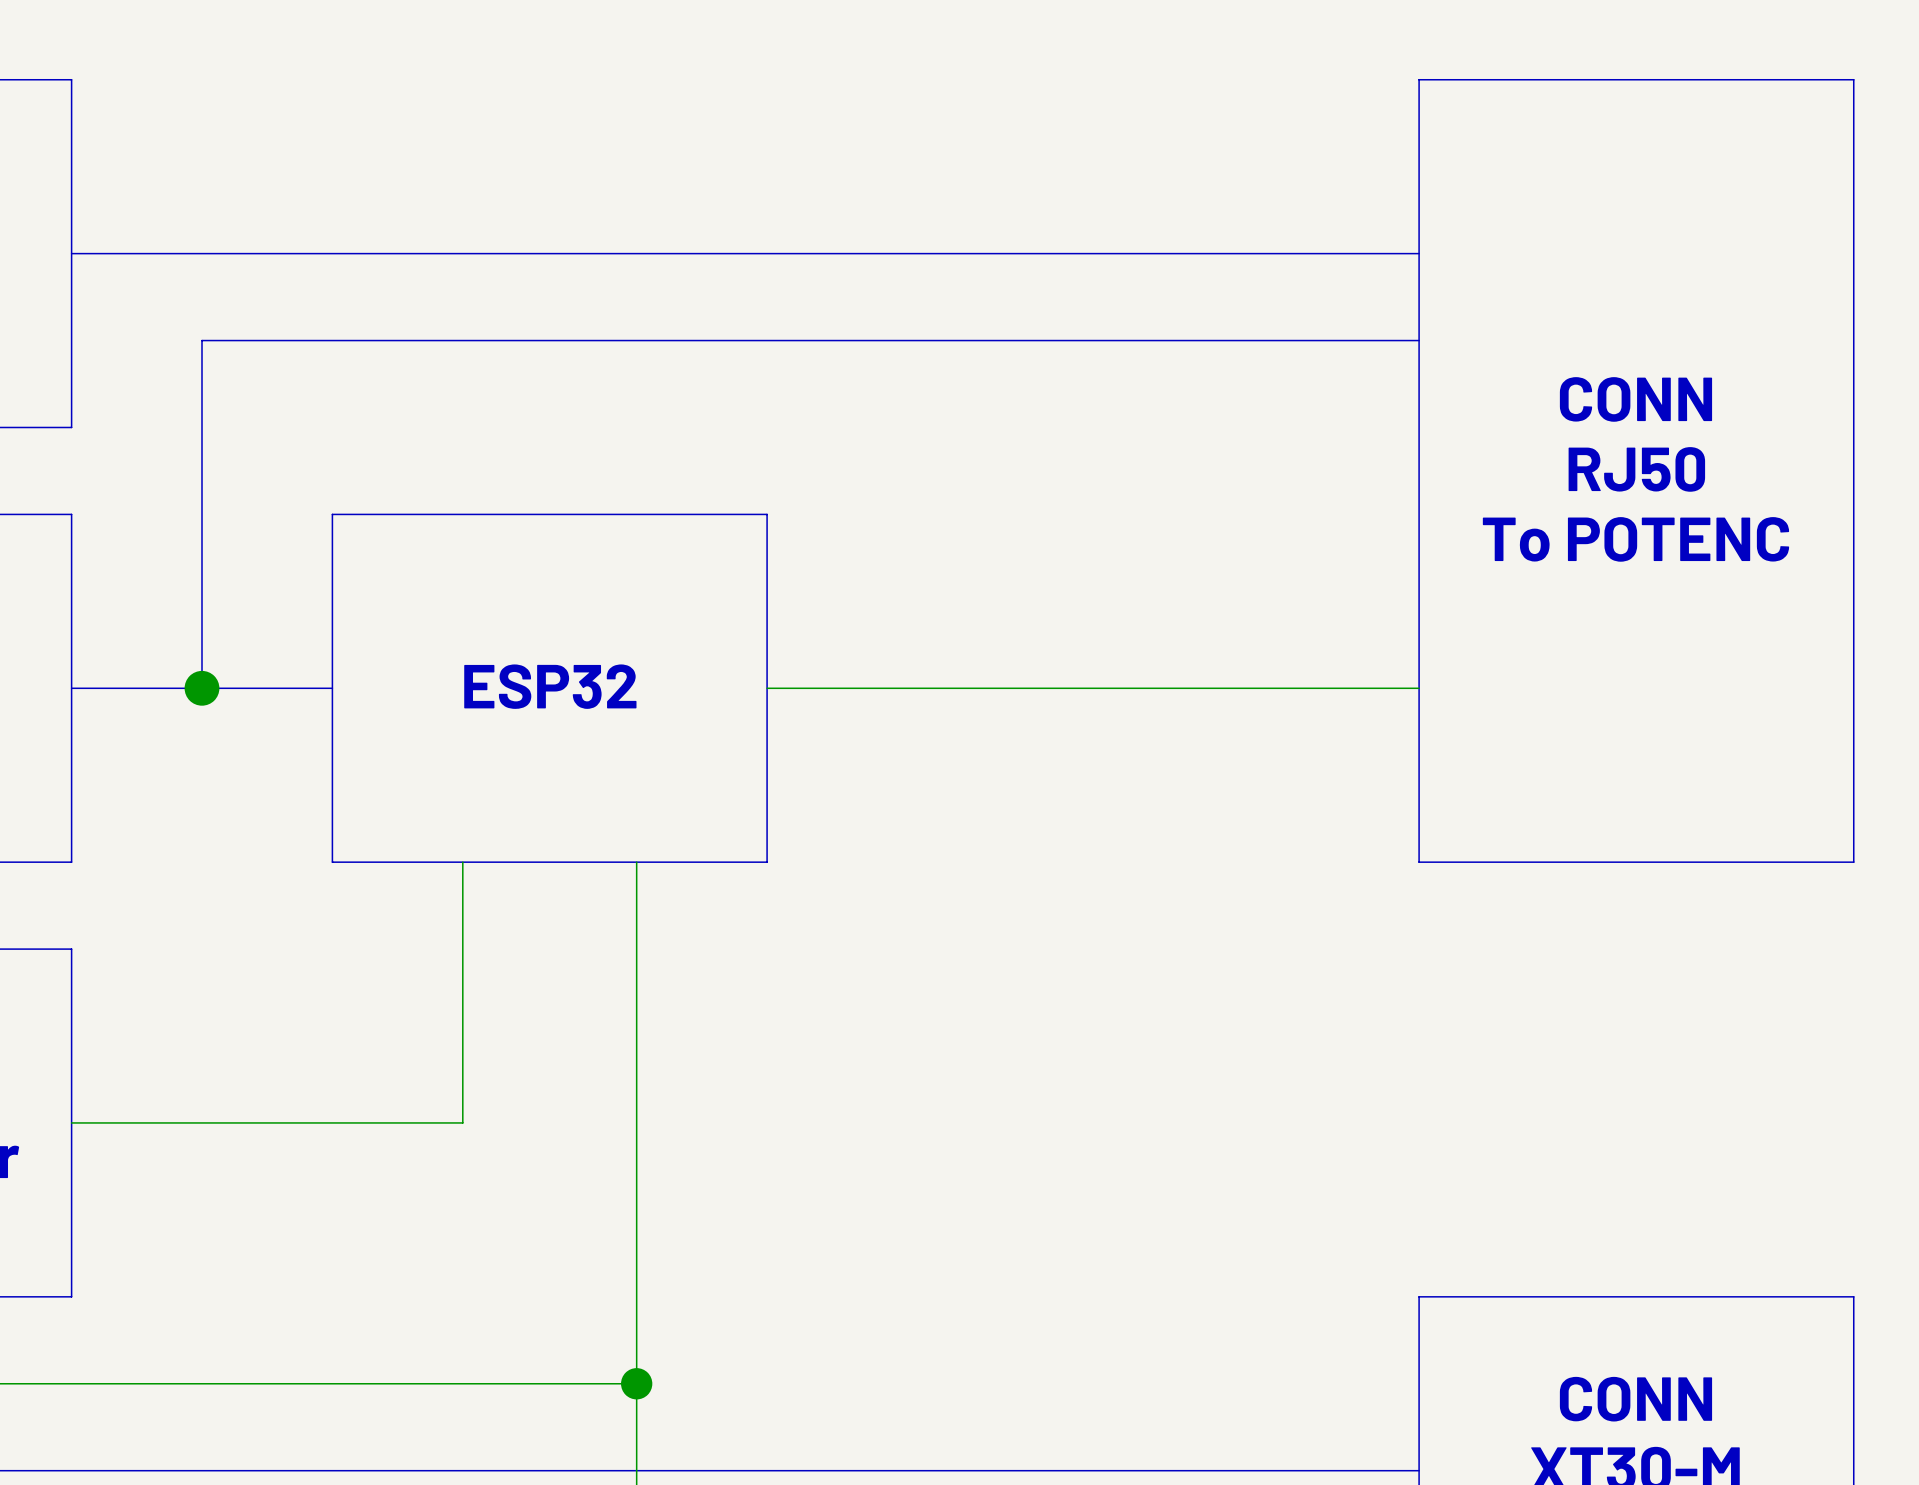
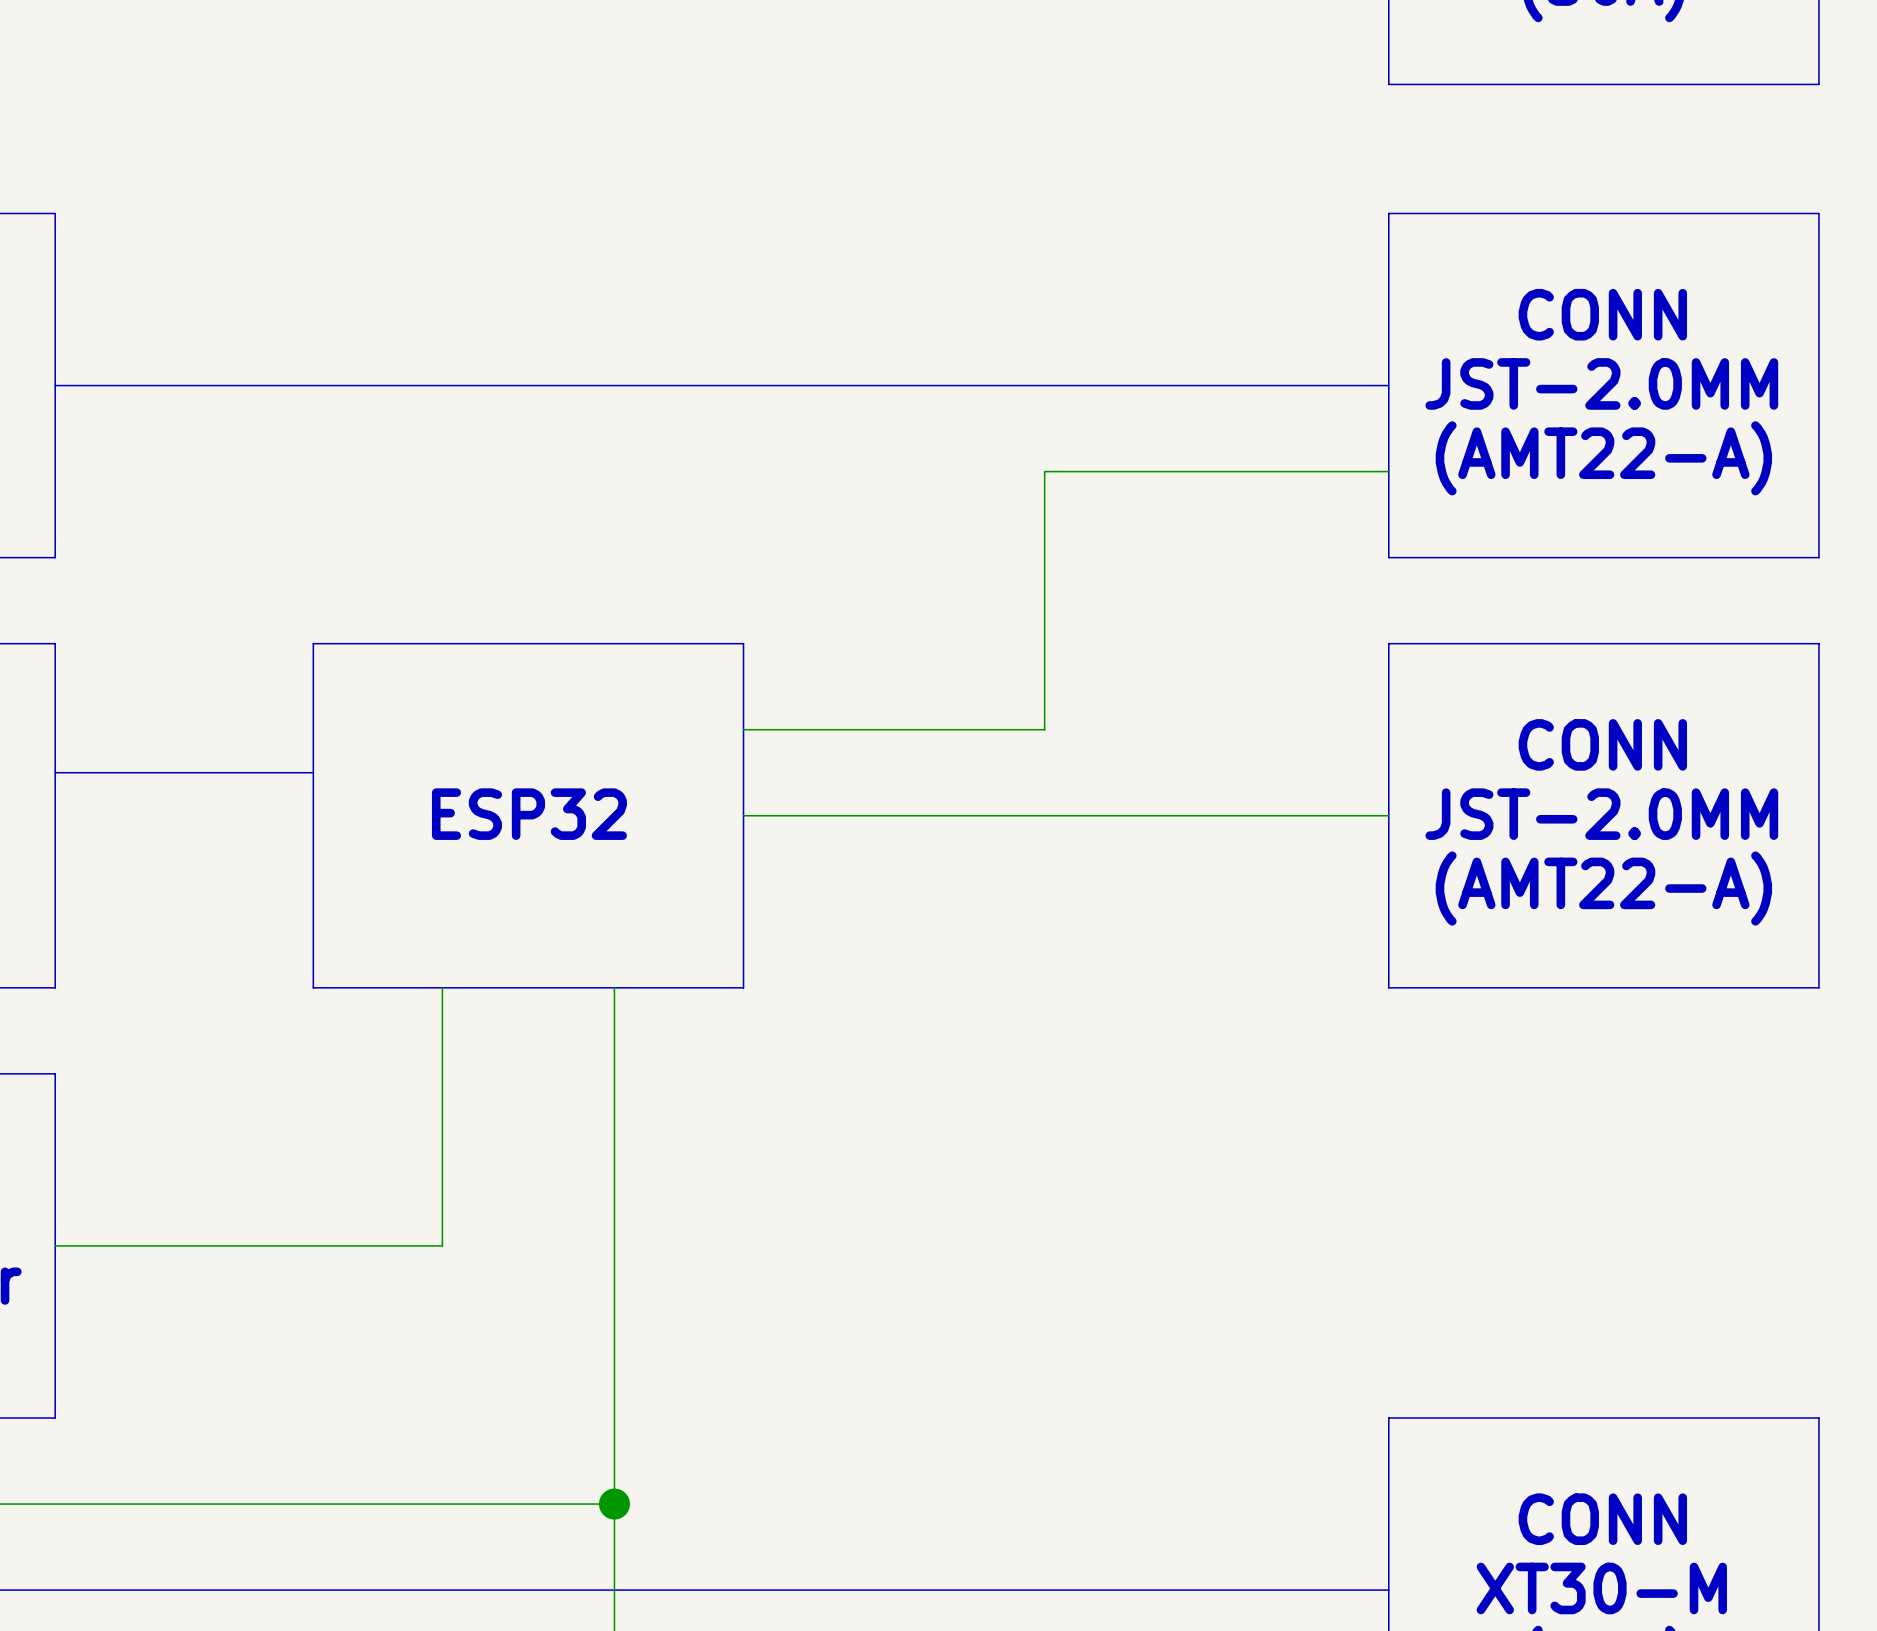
text: none -> CONN (1602, 314)
text: none -> JST-2.0MM (1601, 383)
text: none -> (AMT22-A) (1603, 458)
wire: none -> (1388, 471) (1044, 471) (1044, 729) (743, 729)
bus: (1419, 340) (202, 340) (202, 688) -> none
text: CONN (1635, 399) -> none
line: (1419, 427) (1419, 514) -> (1388, 557) (1818, 557)
line: (1853, 427) (1853, 514) -> (1388, 643) (1818, 643)
text: RJ50 (1636, 469) -> none
text: To POTENC (1635, 539) -> none
text: none -> CONN (1602, 744)
text: none -> JST-2.0MM (1601, 814)
bus: (71, 688) (332, 688) -> (55, 772) (313, 772)
junction: (202, 688) -> none
text: none -> (AMT22-A) (1603, 888)

